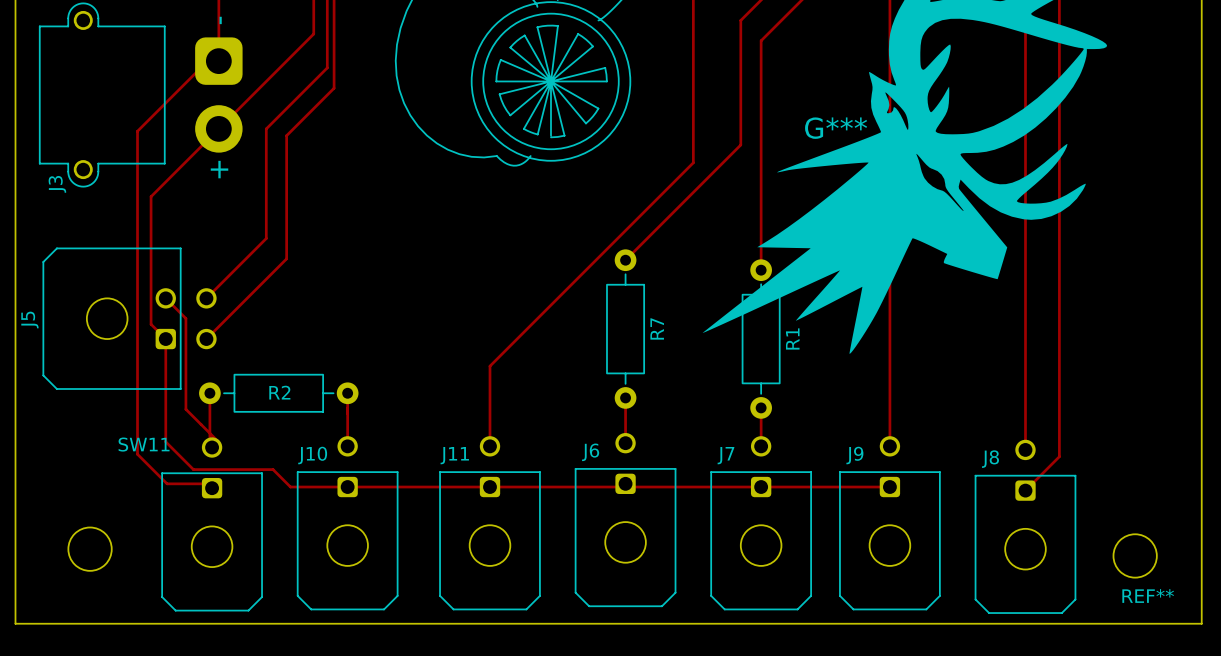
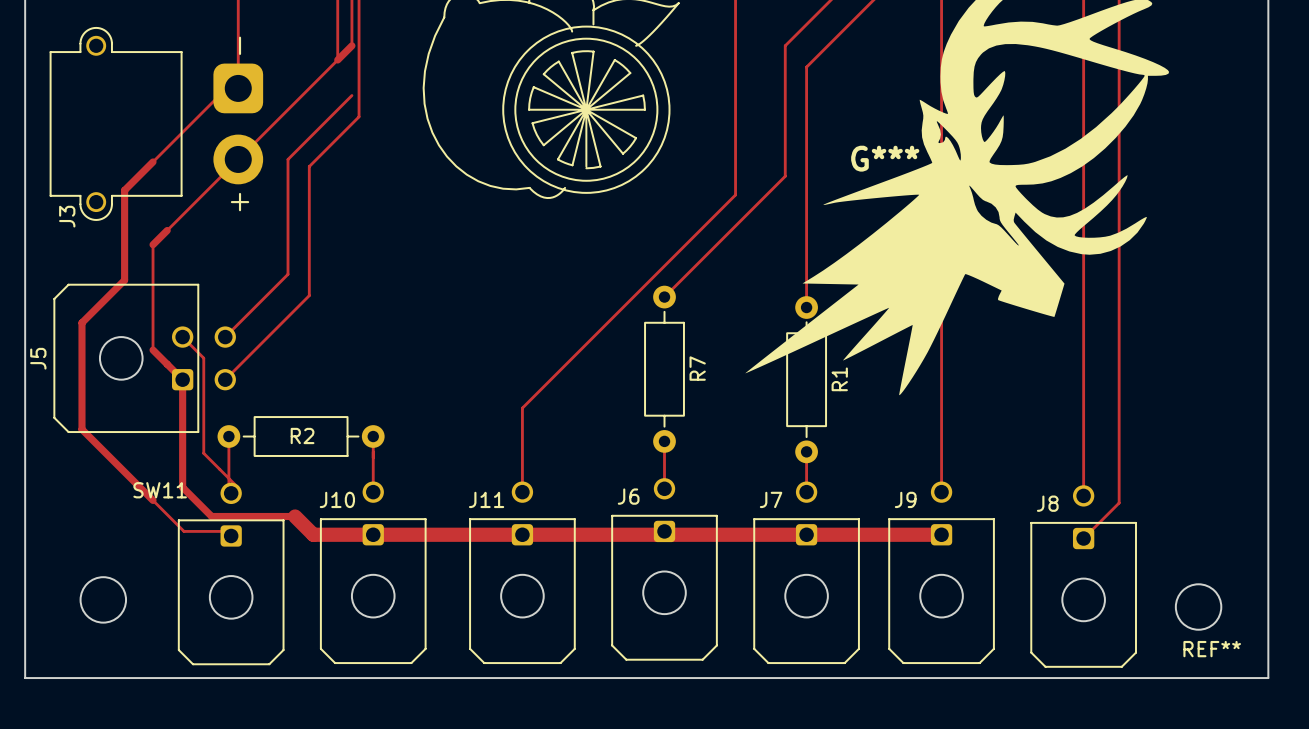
top track: (327, 20) (327, 67) -> (351, 45) (337, 60)
top track: (137, 131) (137, 210) -> (167, 230) (153, 244)
top track: (151, 196) (151, 324) -> (153, 350) (167, 364)
top track: (137, 310) (137, 454) -> (153, 161) (124, 190) (124, 280) (81, 322) (81, 429) (153, 500)
top track width: thin (151, 324) (165, 339) (165, 441) (193, 469) (273, 469) (290, 487) (889, 487) -> thick (167, 364) (182, 379) (182, 487) (211, 516) (295, 516) (313, 534) (941, 534)

